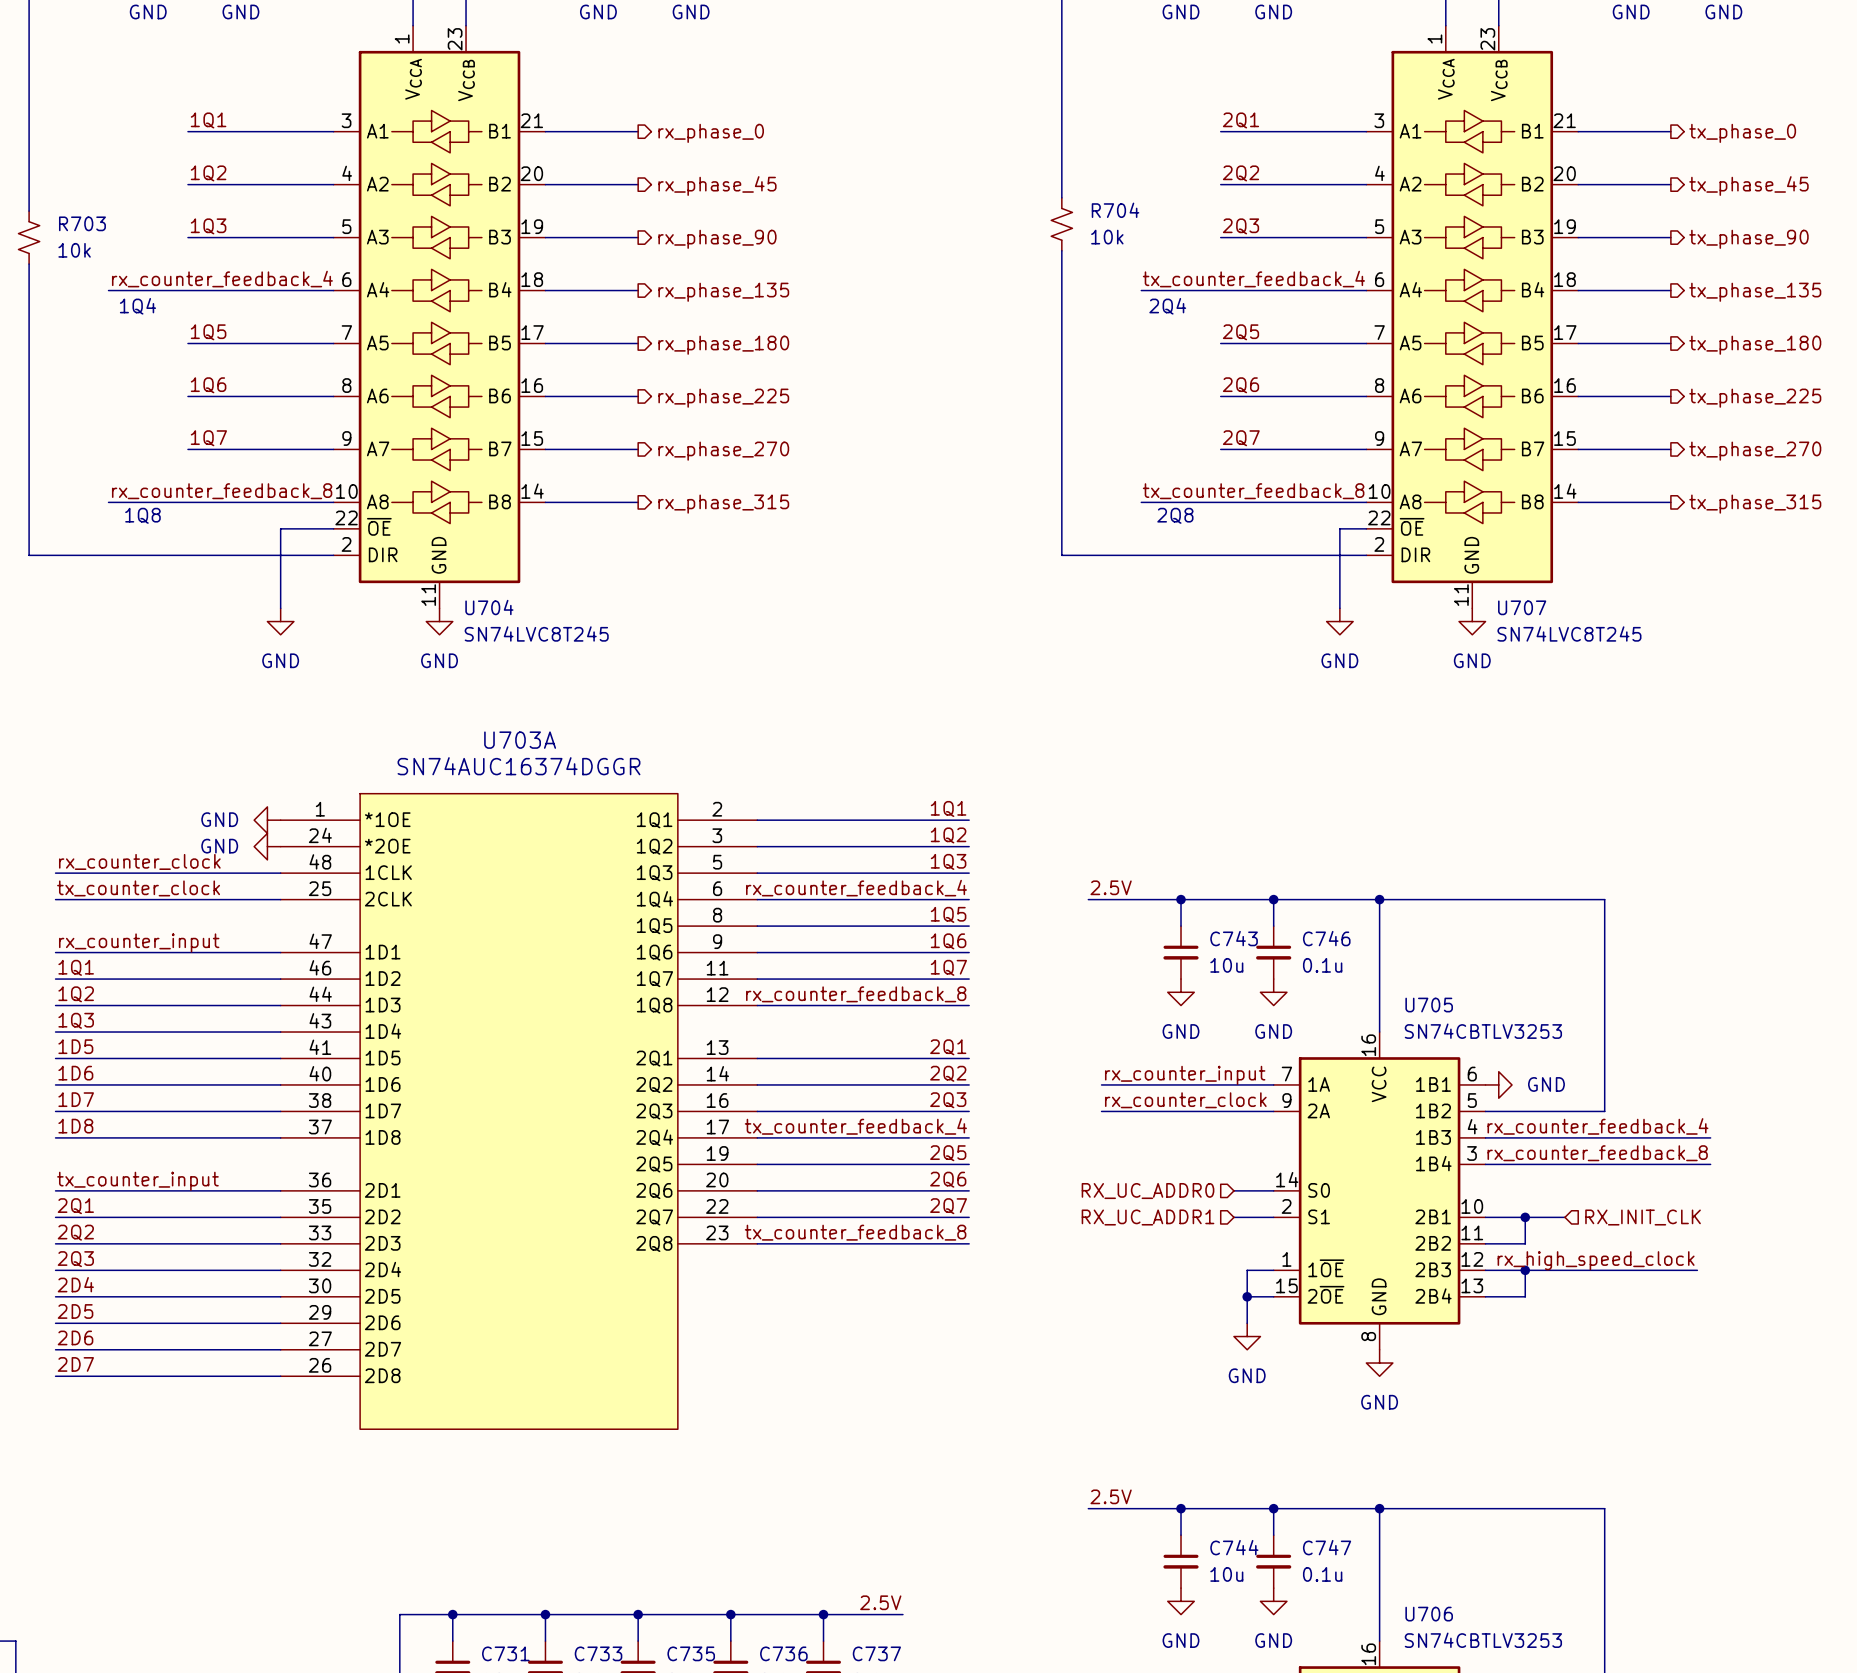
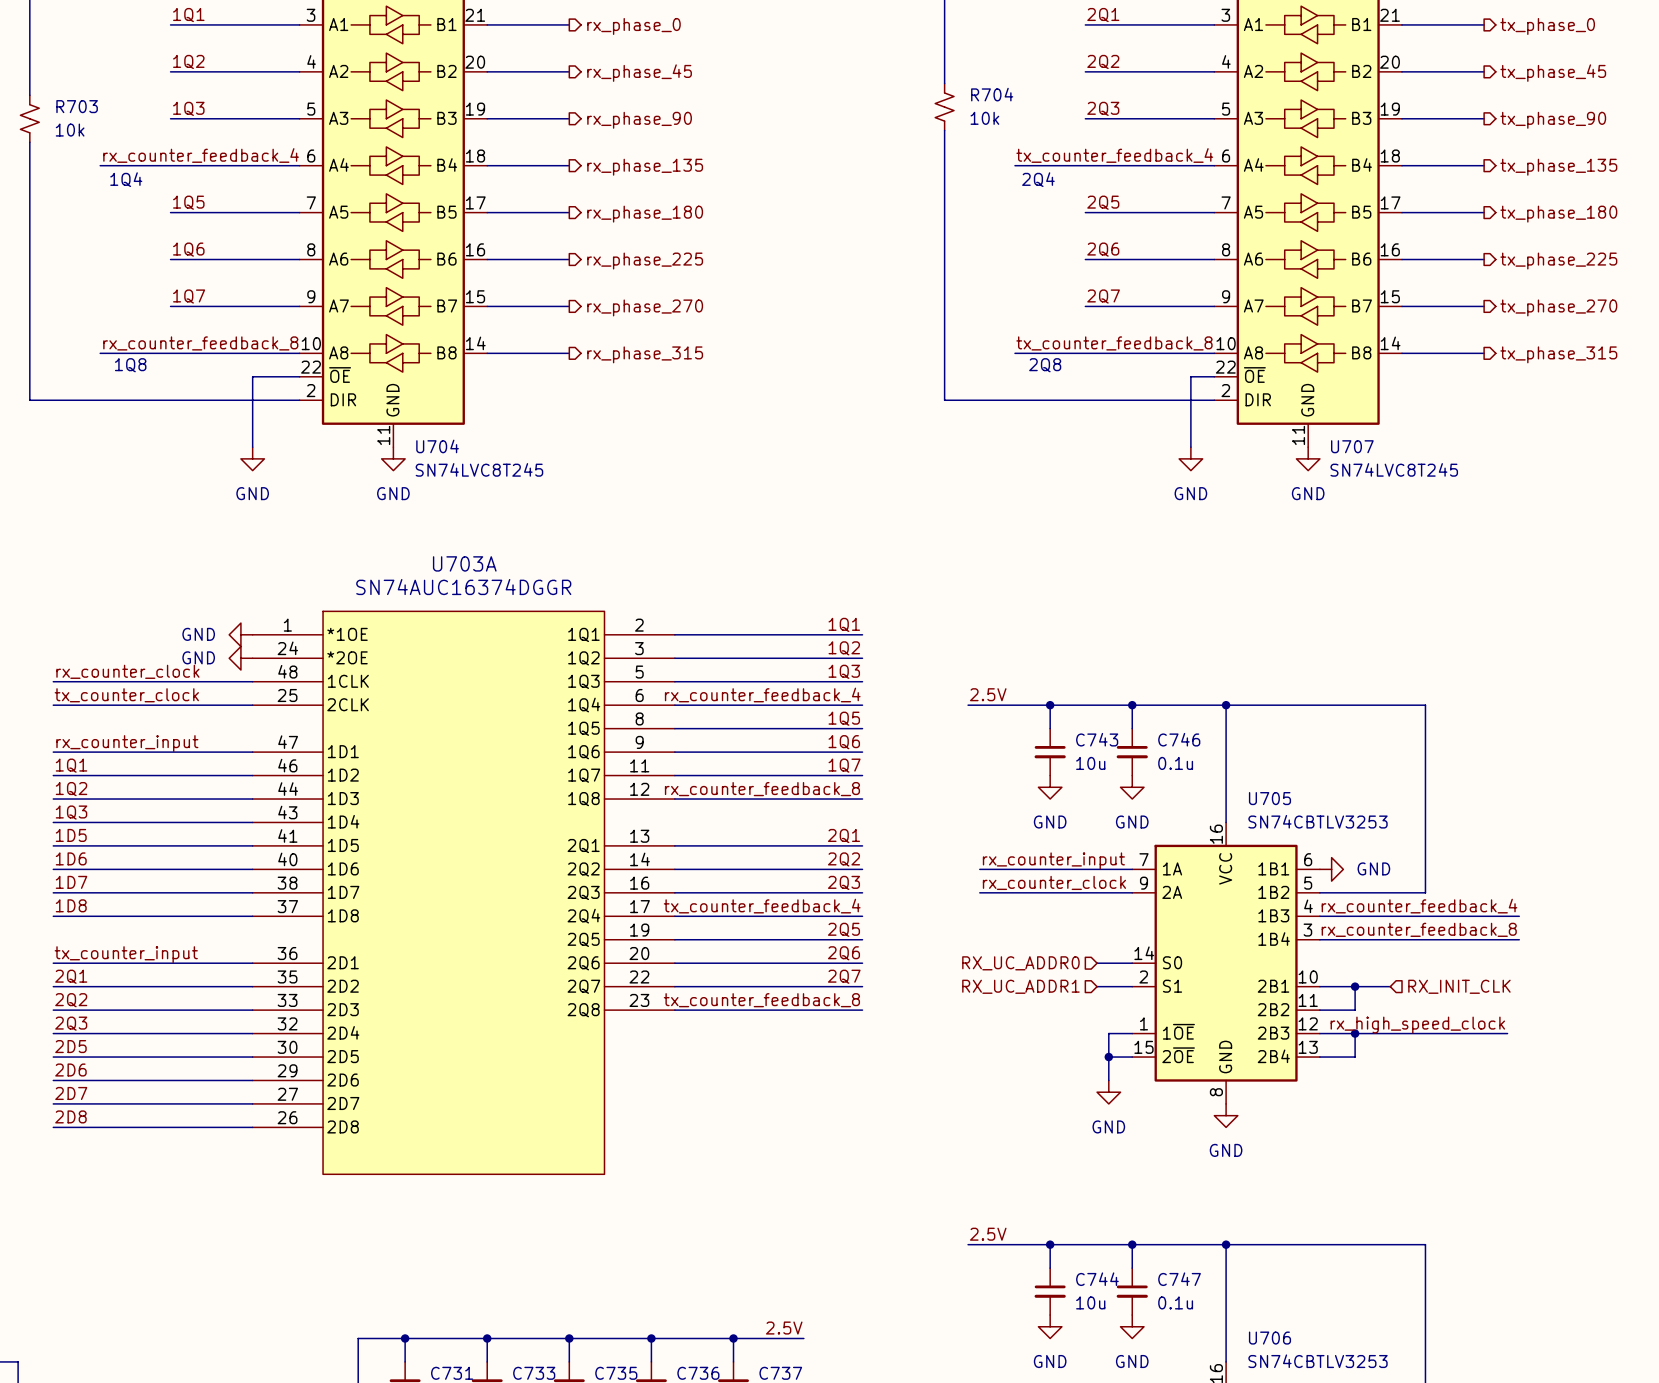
label: 2D4 (75, 1284) -> 2D5 (70, 1046)
label: 2D5 (75, 1311) -> 2D6 (70, 1070)
label: 2D6 (75, 1337) -> 2D7 (71, 1093)
label: 2D7 (75, 1364) -> 2D8 (70, 1116)

